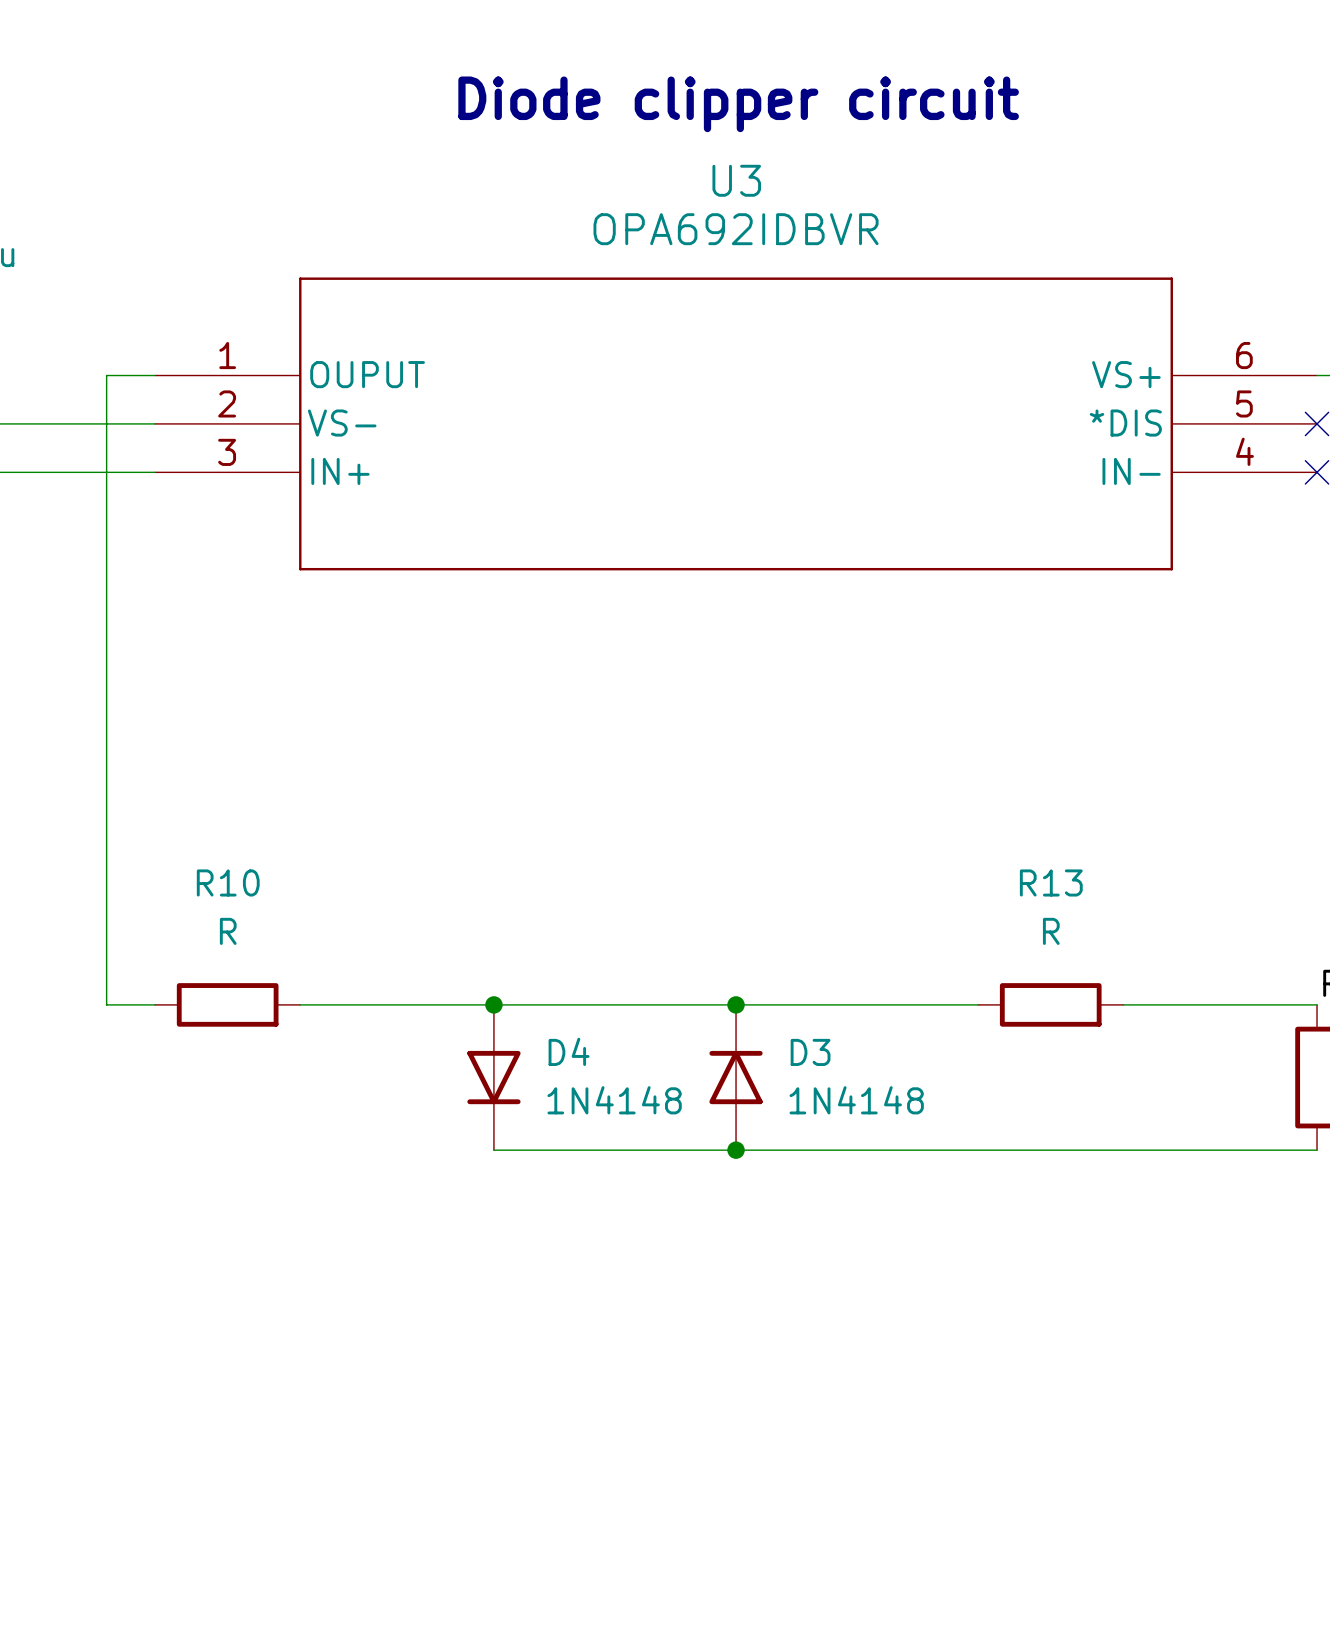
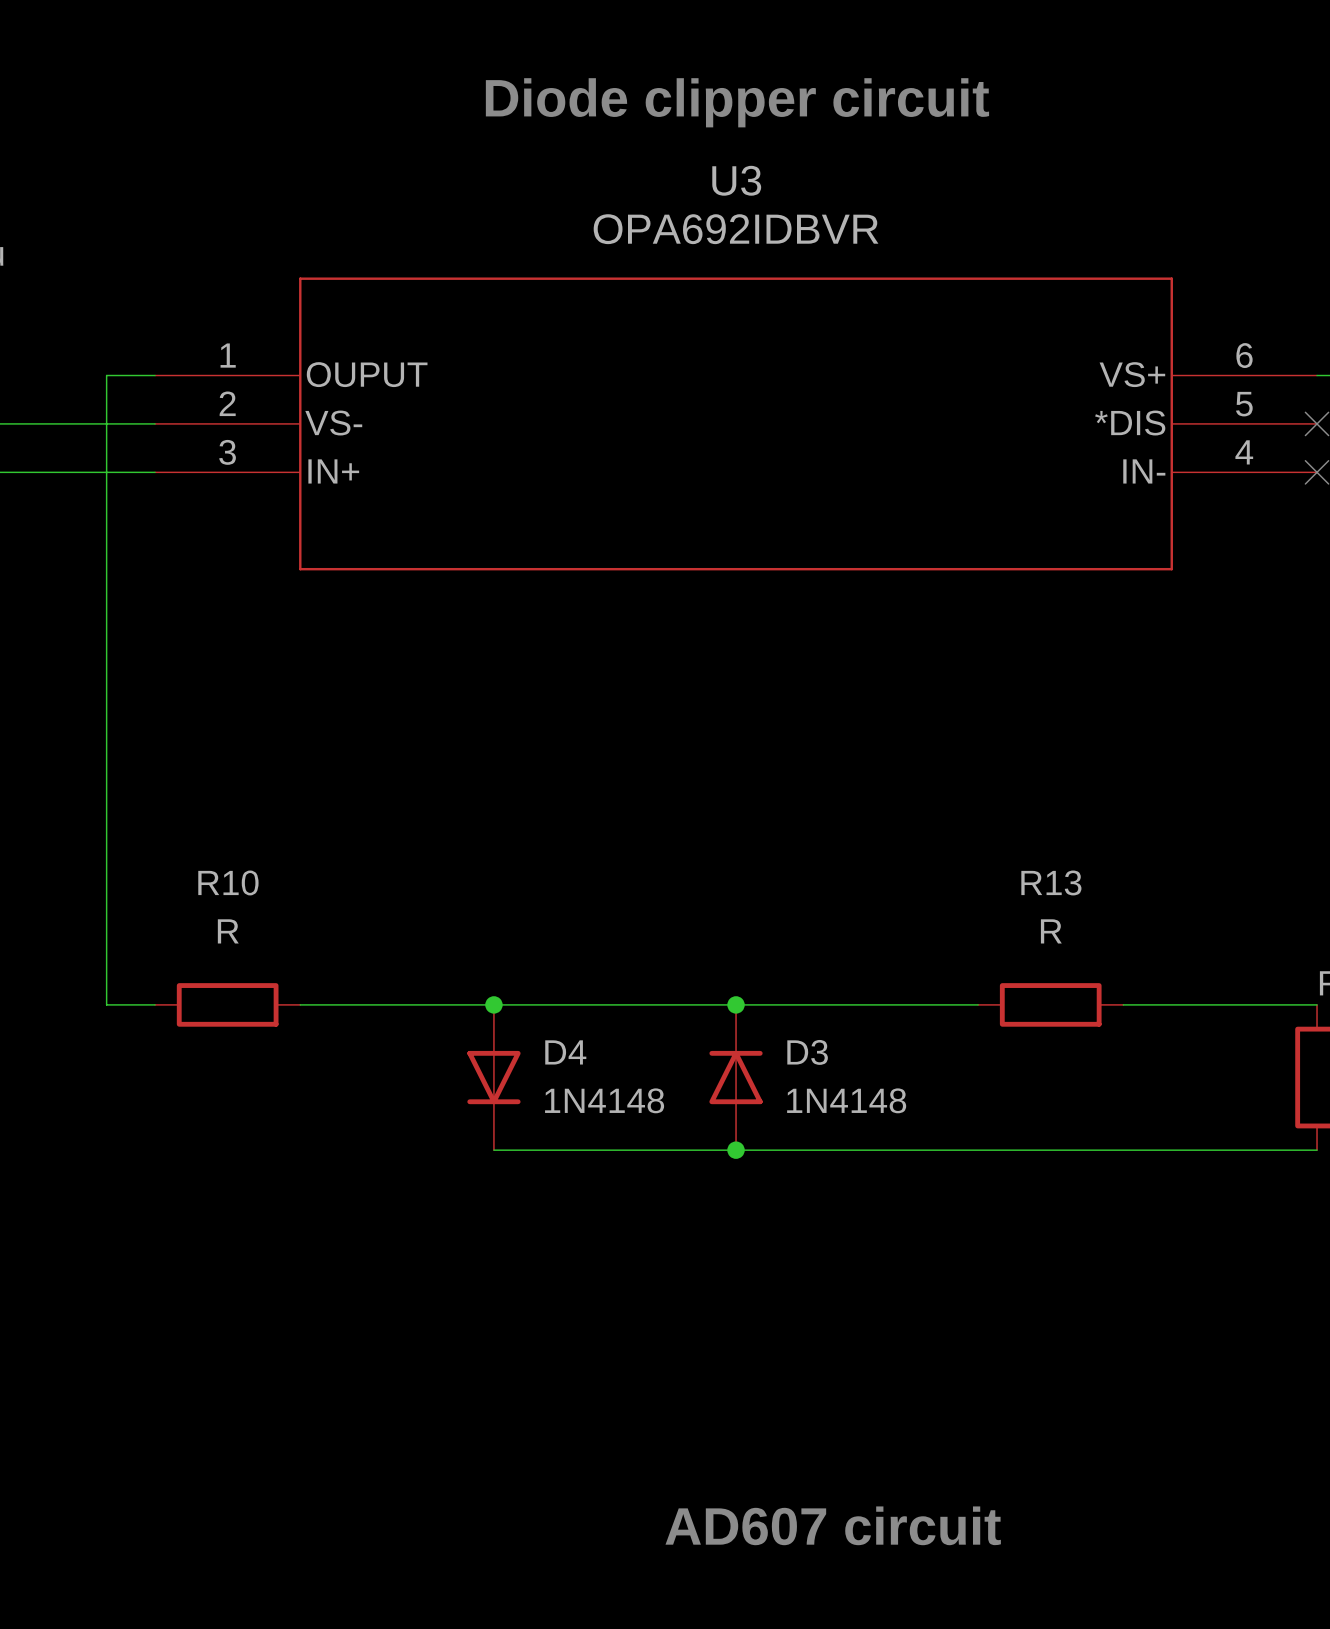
text: none -> AD607 circuit (833, 1525)

